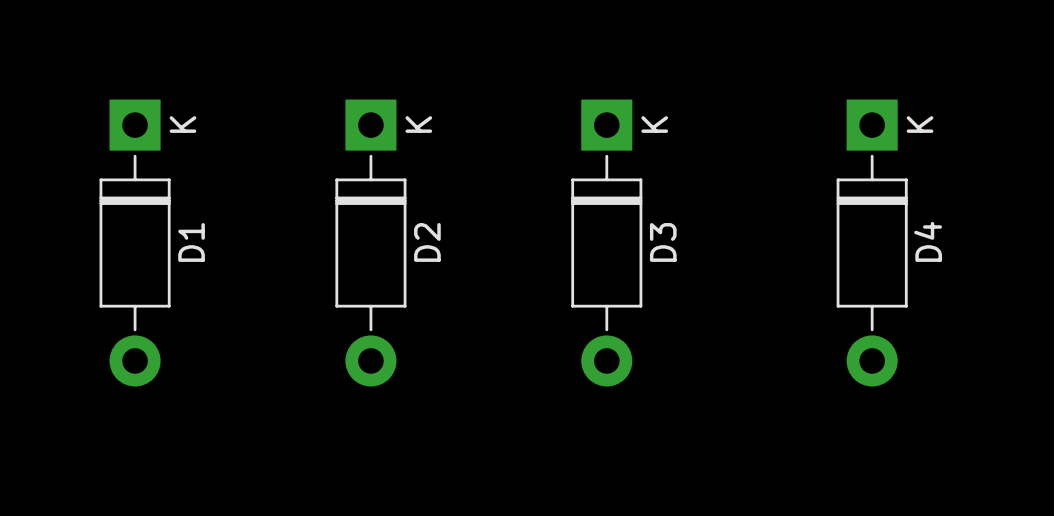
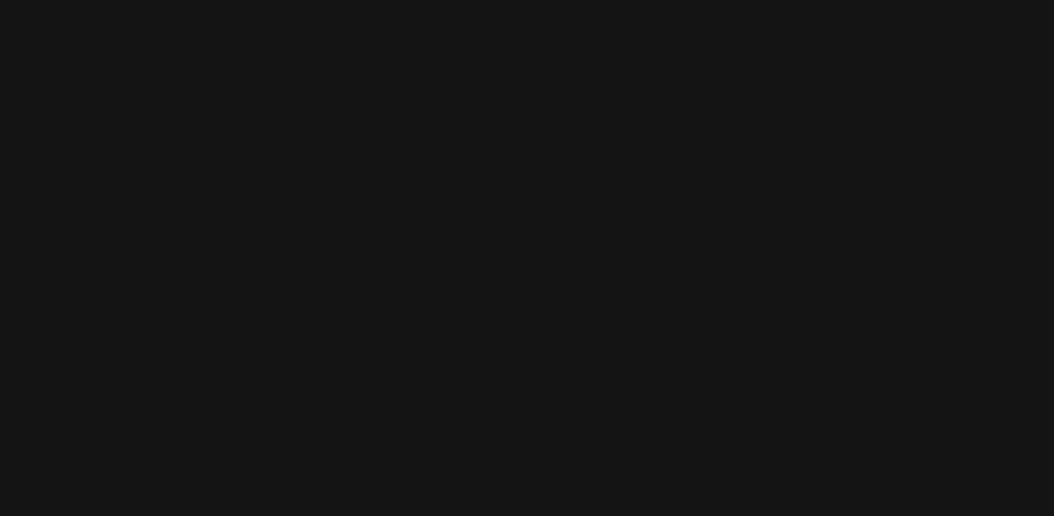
D1: (135, 243) -> none
D2: (370, 243) -> none
D3: (606, 243) -> none
D4: (872, 243) -> none

